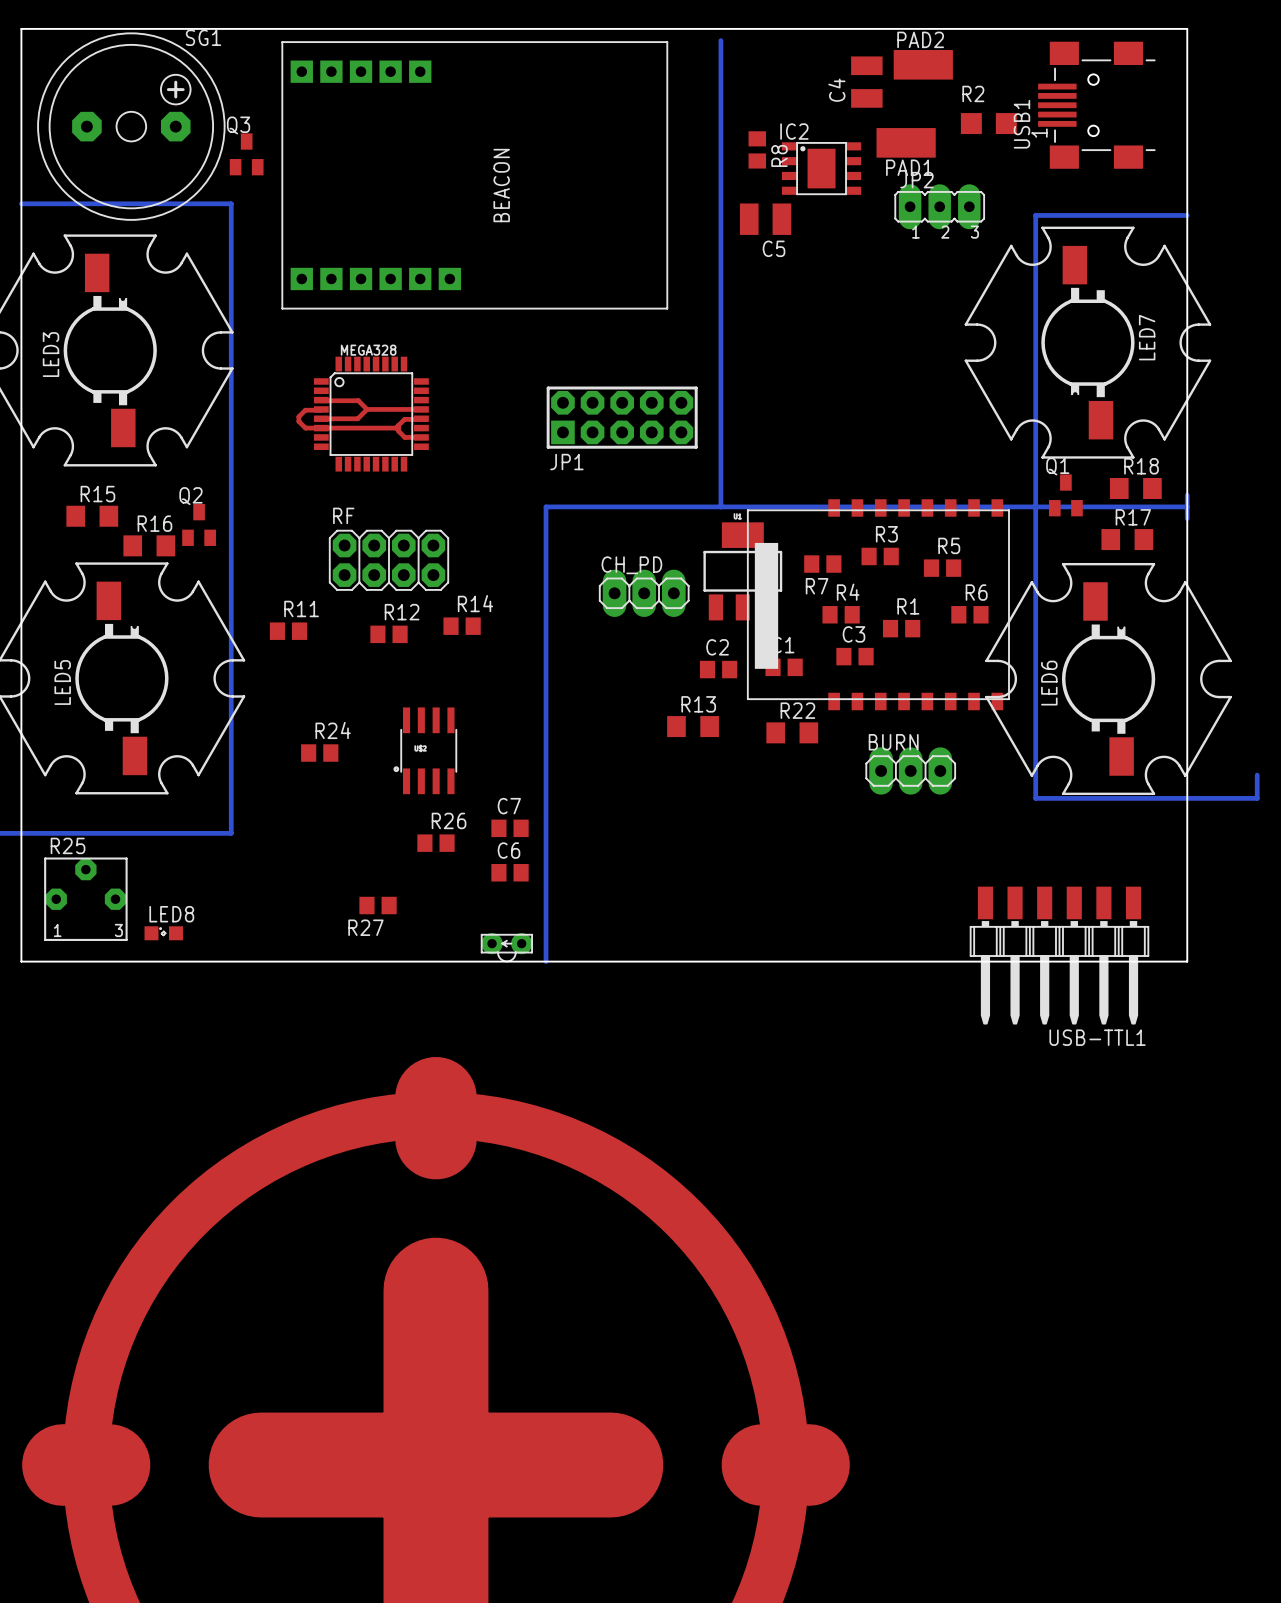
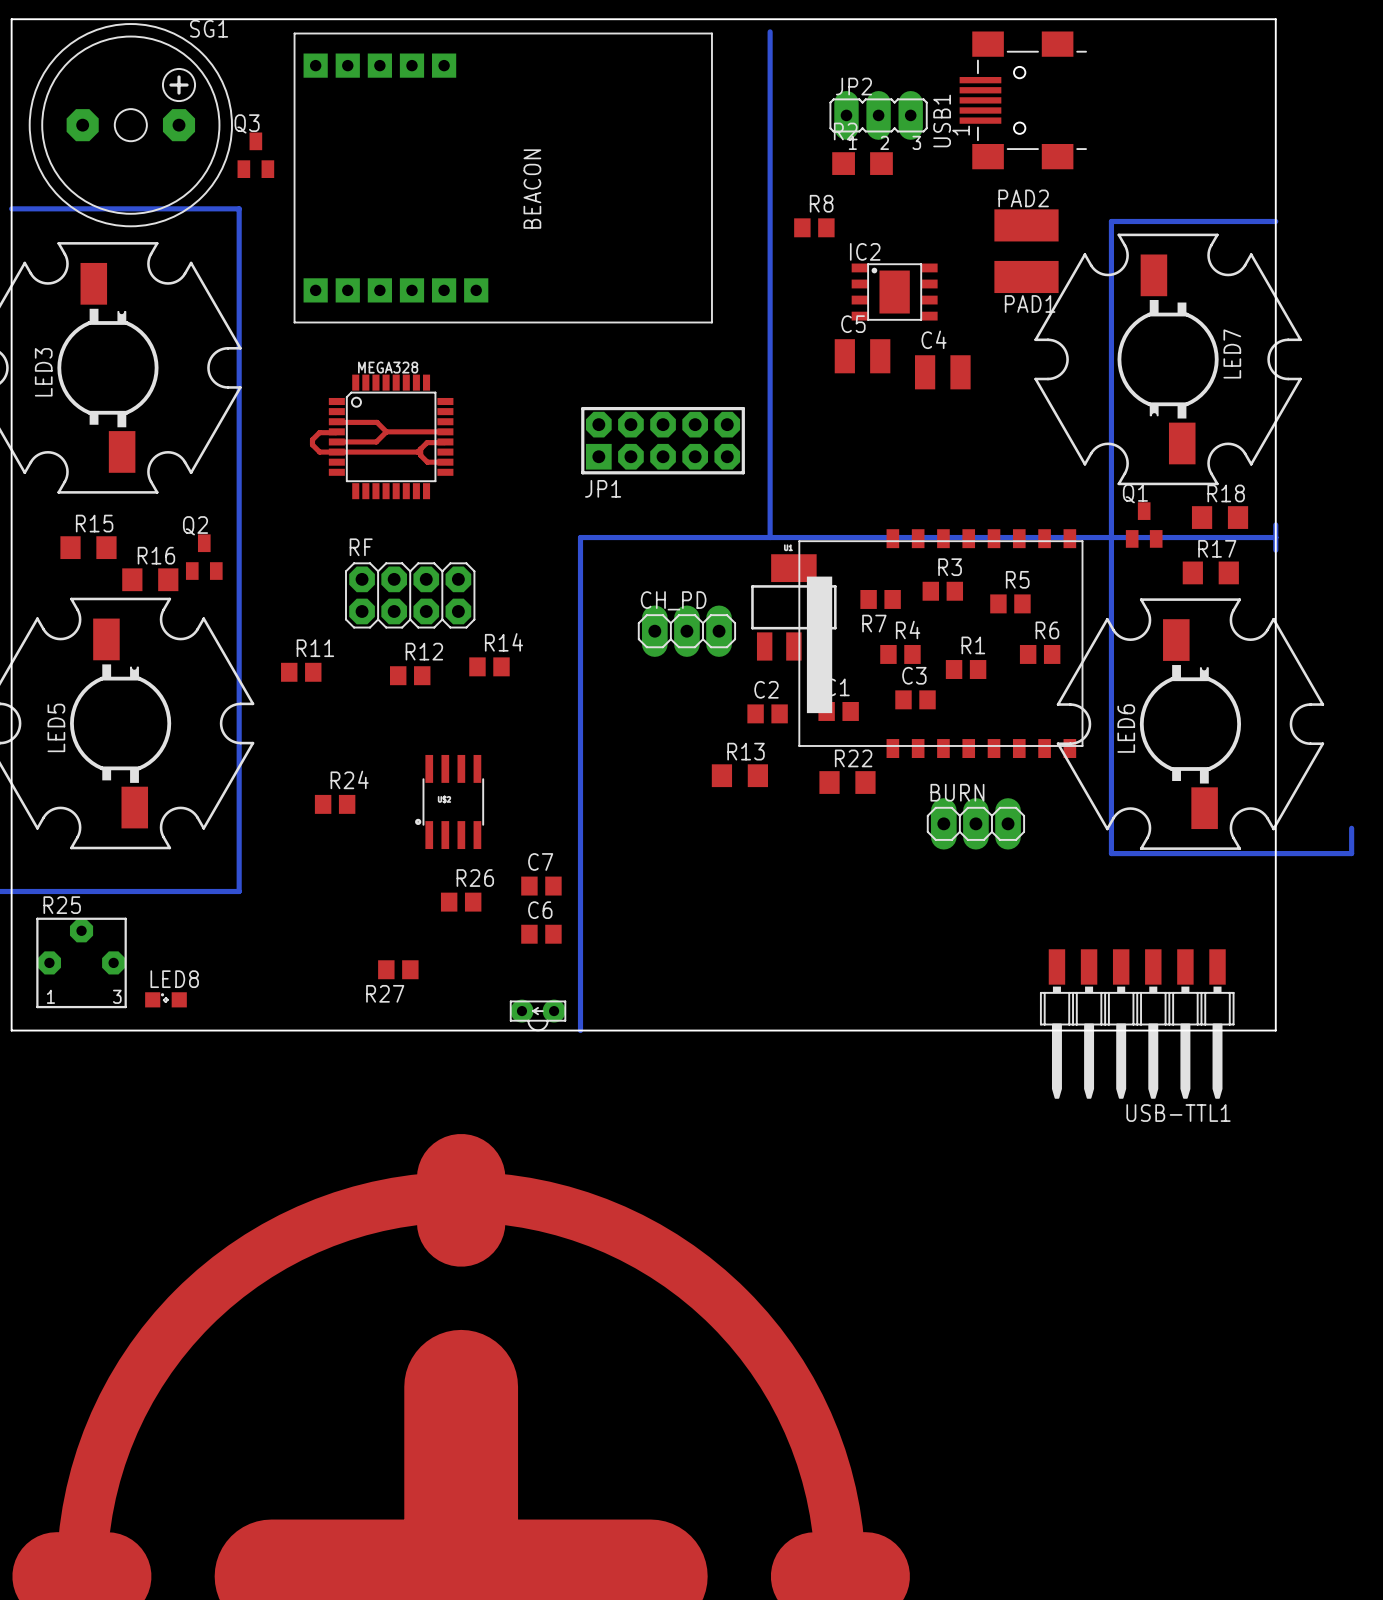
PAD2 position: (923, 64) -> (1026, 225)
C4 rotation: 0° (866, 82) -> 90° clockwise (942, 372)
C4 position: (866, 82) -> (942, 372)
USB1 position: (1096, 105) -> (1023, 100)
R2 position: (988, 123) -> (862, 163)
PAD1 position: (906, 142) -> (1026, 276)
R8 rotation: 0° (757, 149) -> 90° clockwise (814, 227)
R8 position: (757, 149) -> (814, 227)
R8 name position: R8 (779, 155) -> R8 (821, 203)
IC2 position: (821, 168) -> (894, 292)
JP2 position: (939, 206) -> (878, 115)
C5 position: (765, 219) -> (862, 356)
C5 name position: C5 (773, 248) -> C5 (853, 324)

